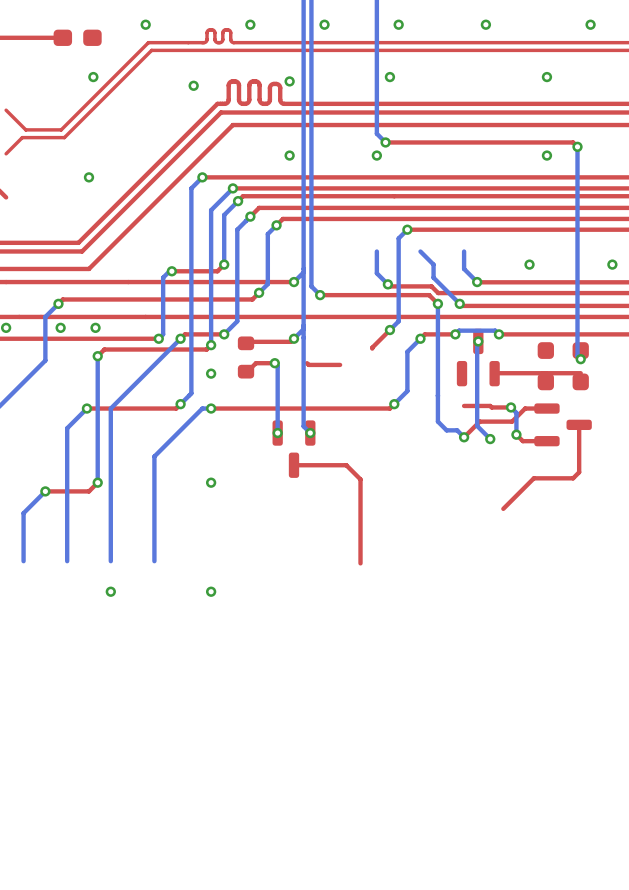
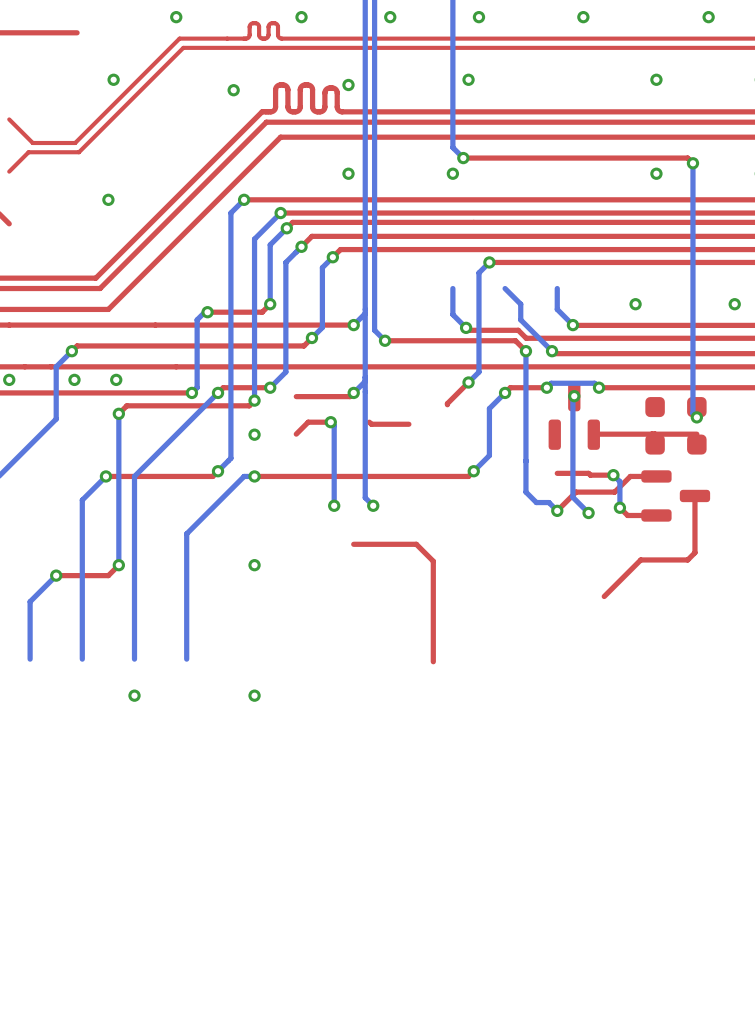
part: (77, 37) -> none
part: (246, 357) -> none
part: (293, 449) -> none

